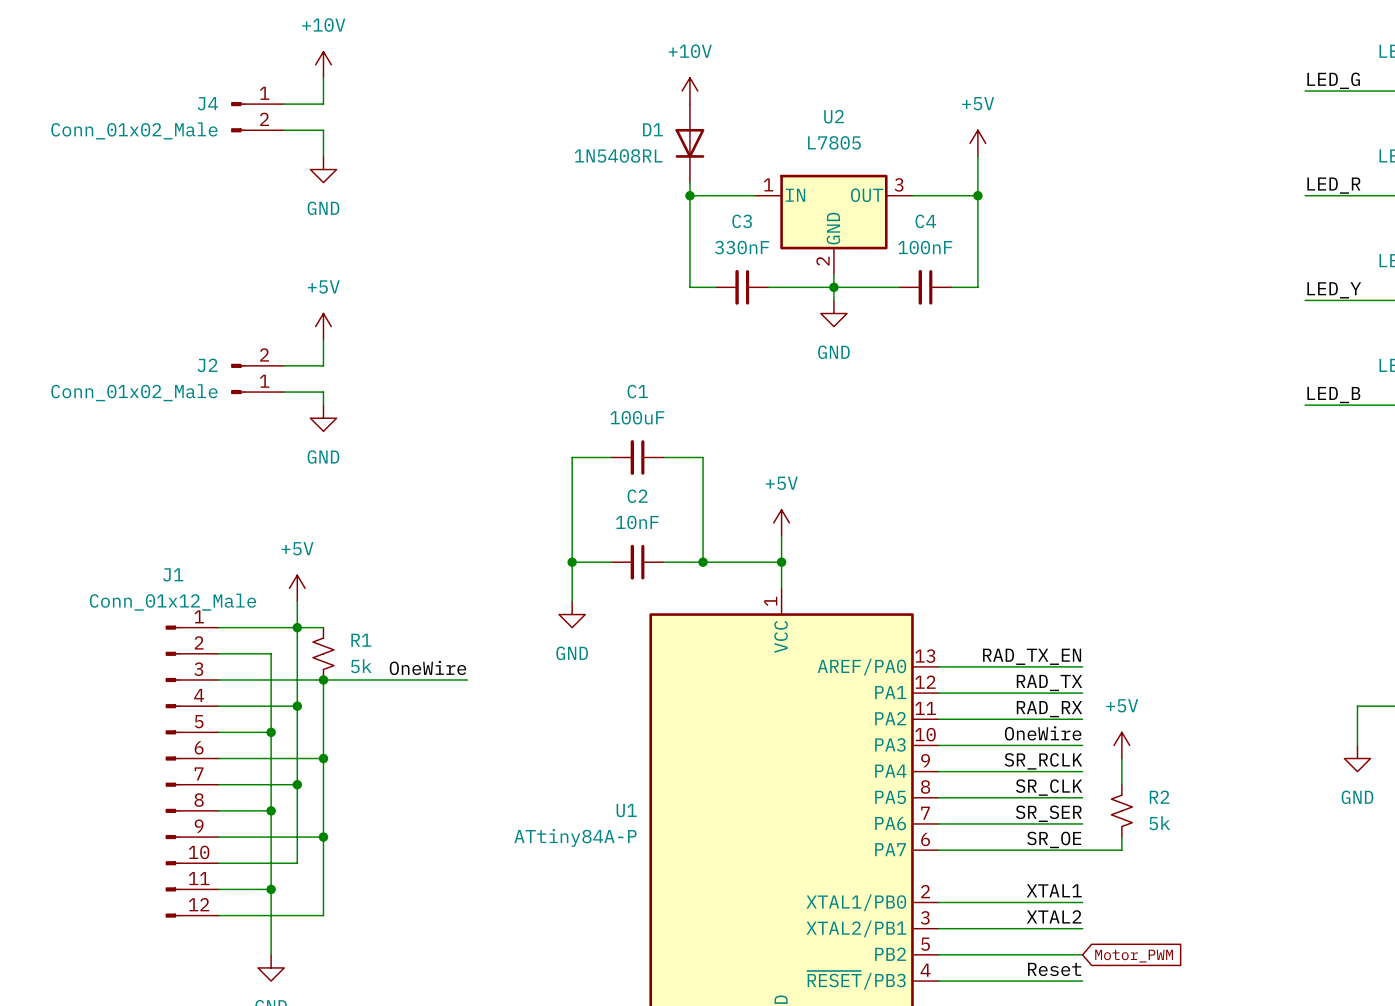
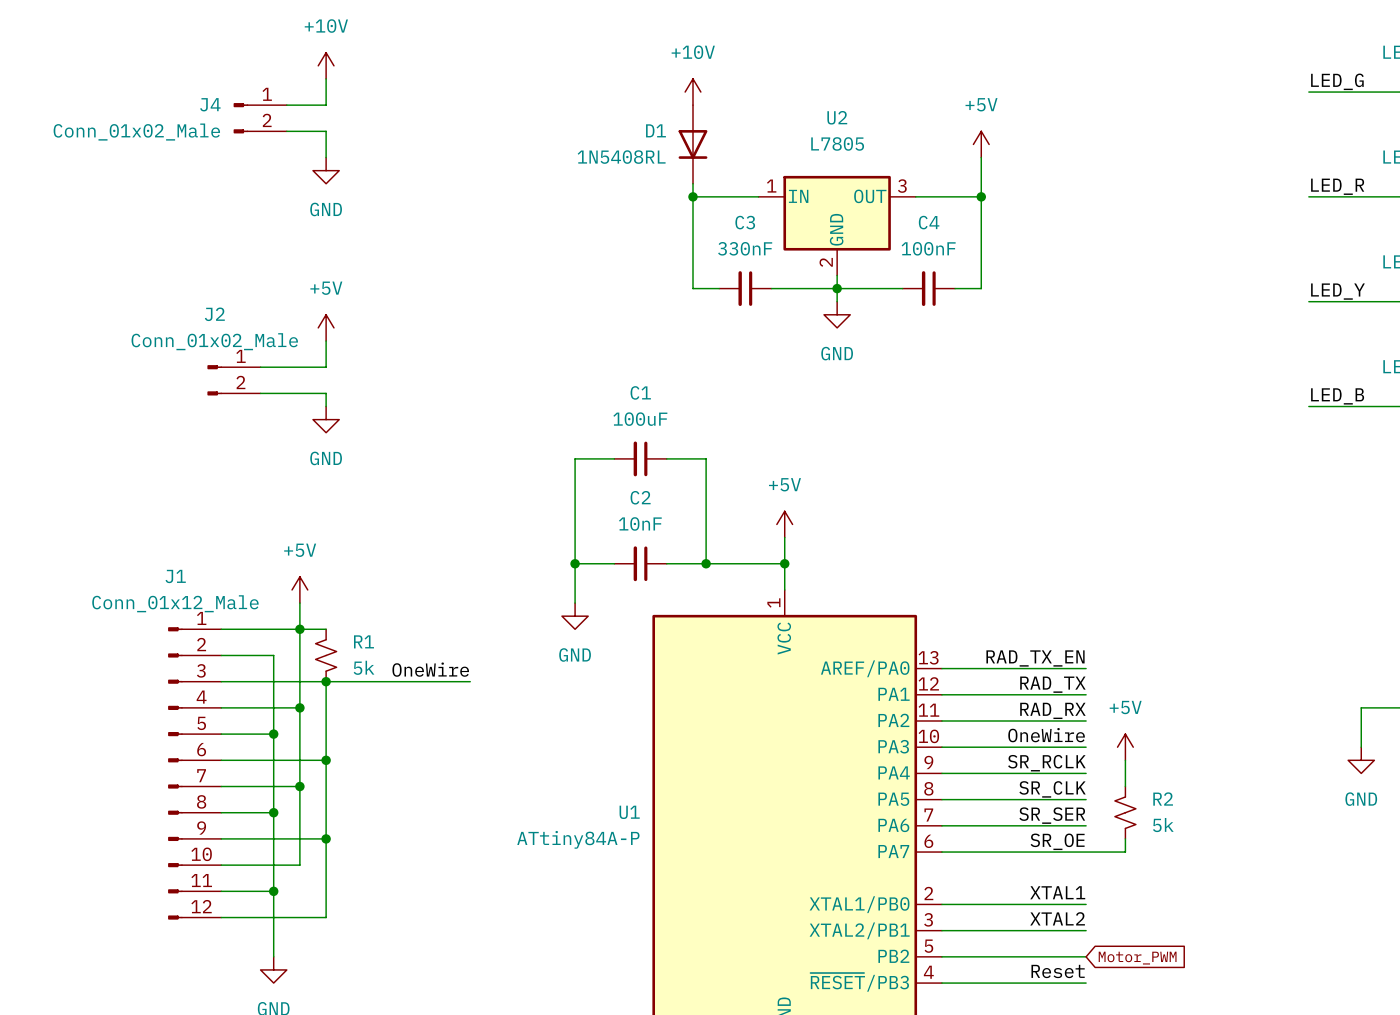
J2 name position: J2 (207, 365) -> J2 (214, 314)
J2 flip: as is (238, 378) -> up-down (214, 380)
J2 value position: Conn_01x02_Male (134, 392) -> Conn_01x02_Male (214, 341)

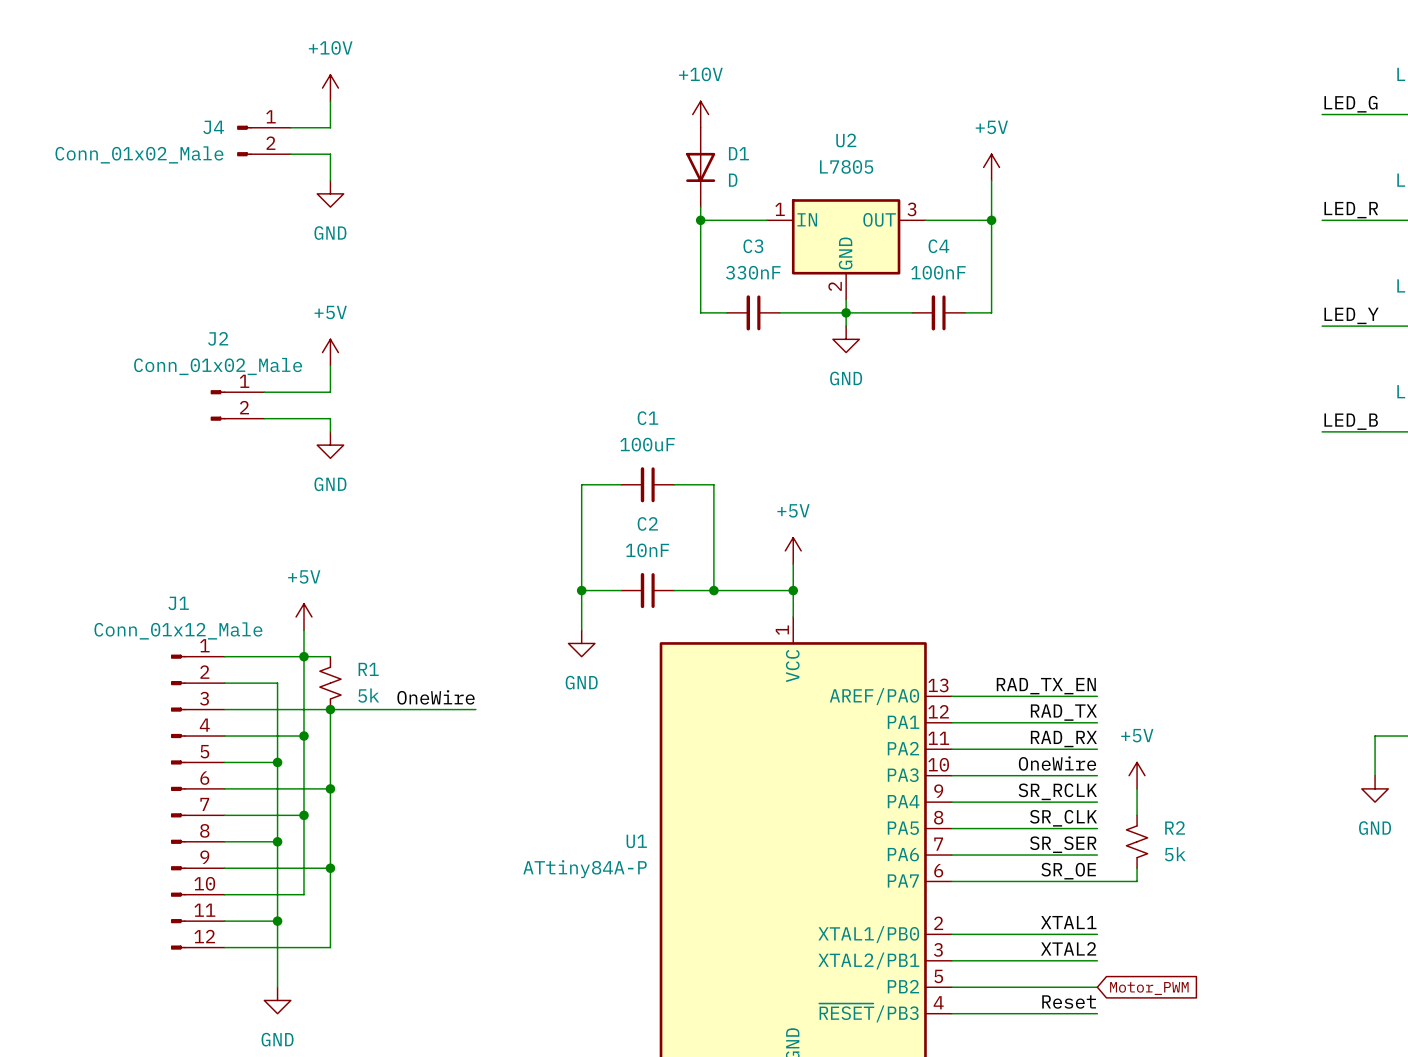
D1 name position: D1 (655, 130) -> D1 (738, 153)
D1 value: 1N5408RL (621, 157) -> D (733, 180)

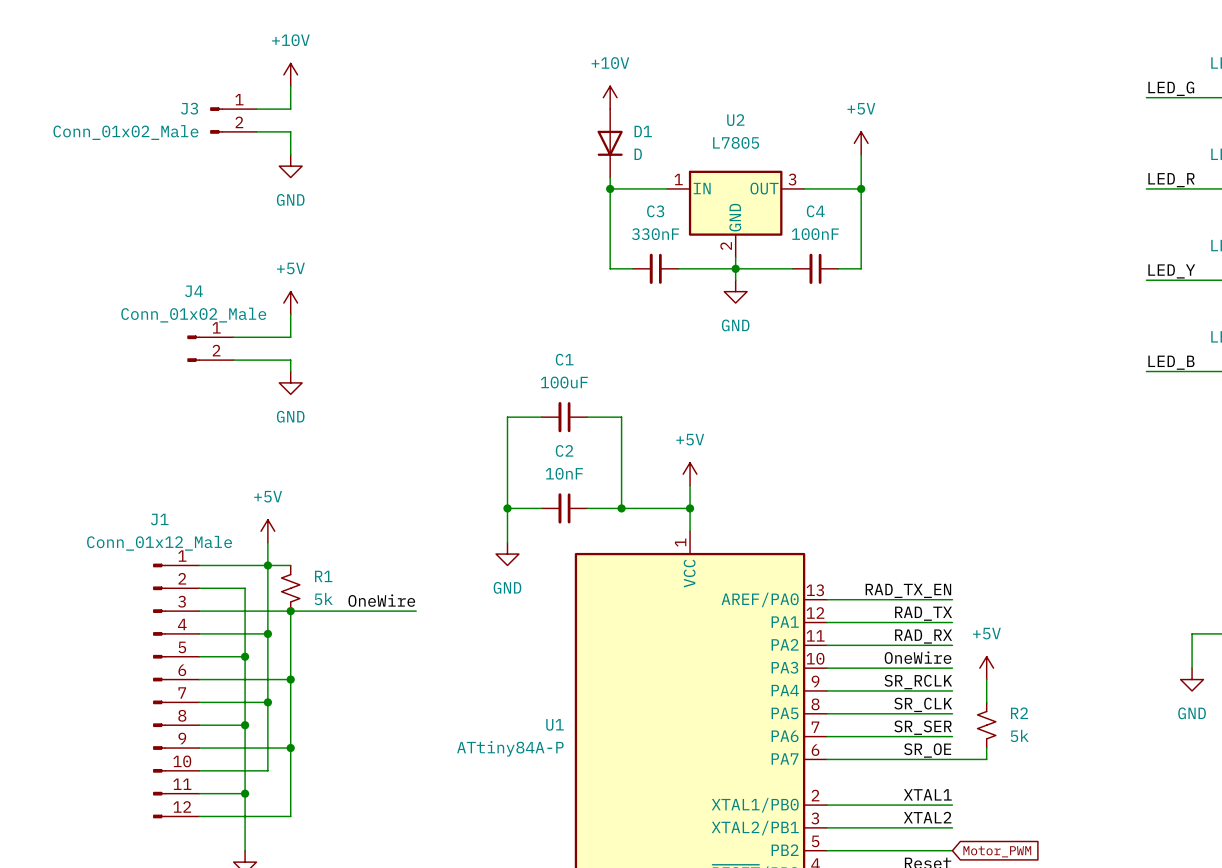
J4 name: J4 (213, 127) -> J3 (189, 108)
J2 name: J2 (218, 338) -> J4 (194, 291)

